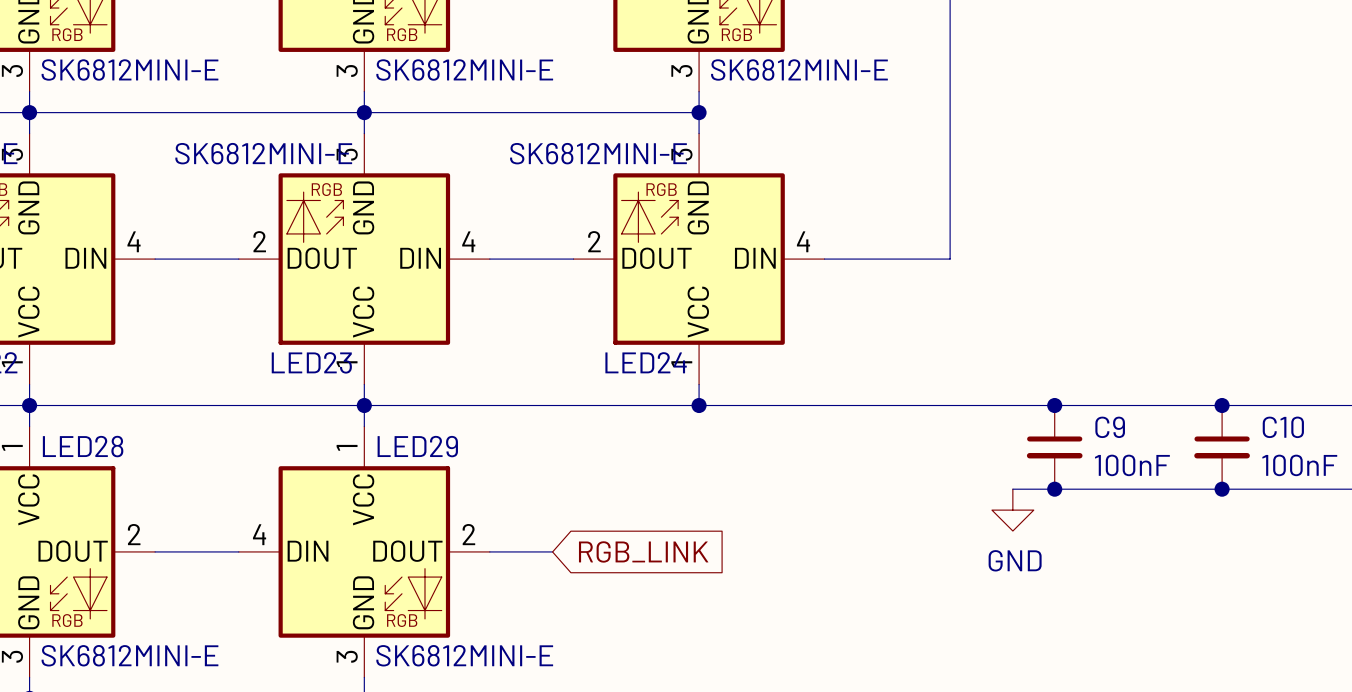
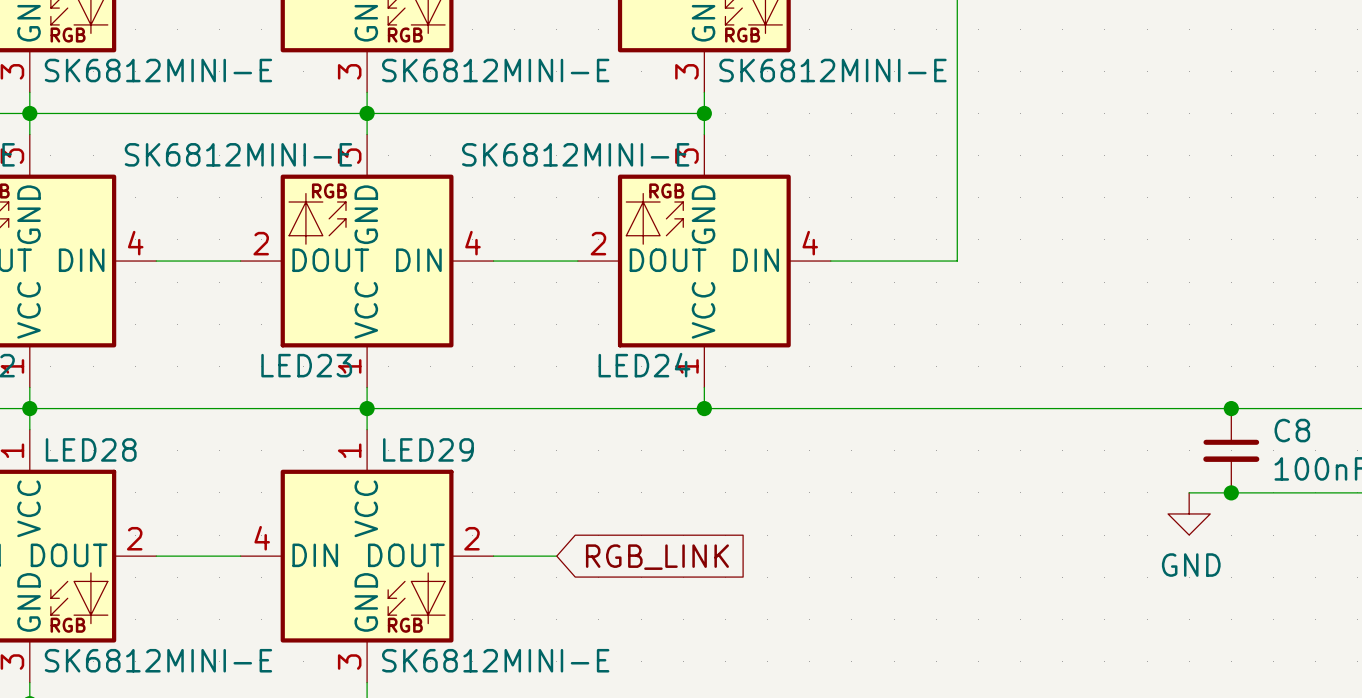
junction: (1054, 405) -> none
C10 name: C10 (1283, 427) -> C8 (1292, 430)
C9: 100nF (1054, 447) -> none
wire: (1012, 489) (1180, 489) -> none
junction: (1054, 489) -> none
power symbol position: GND (1012, 510) -> GND (1189, 513)

